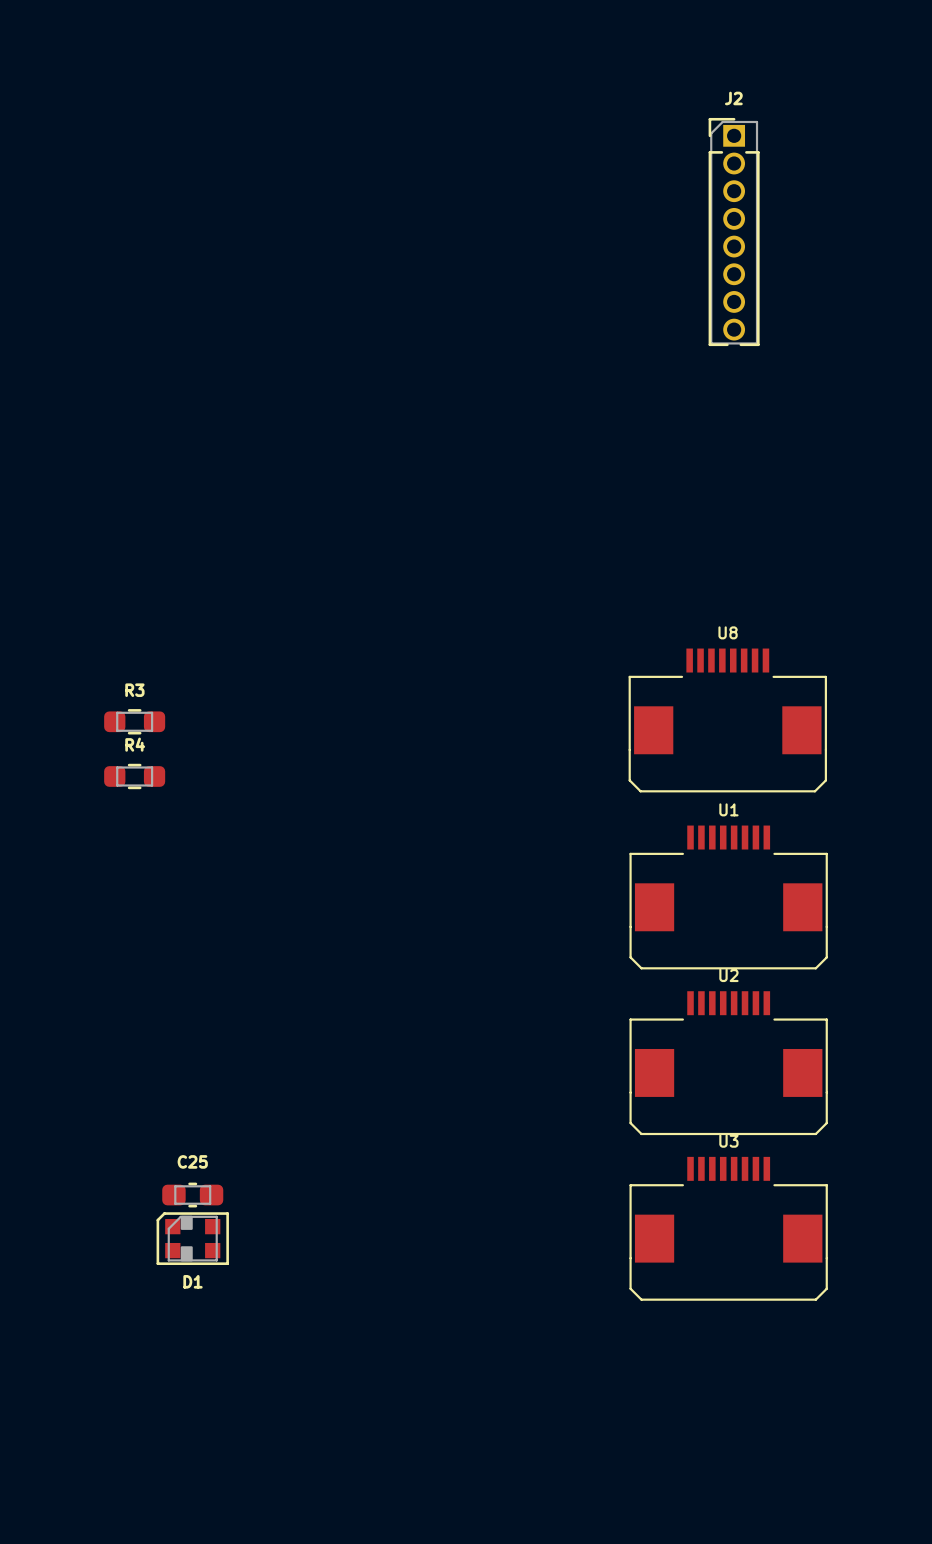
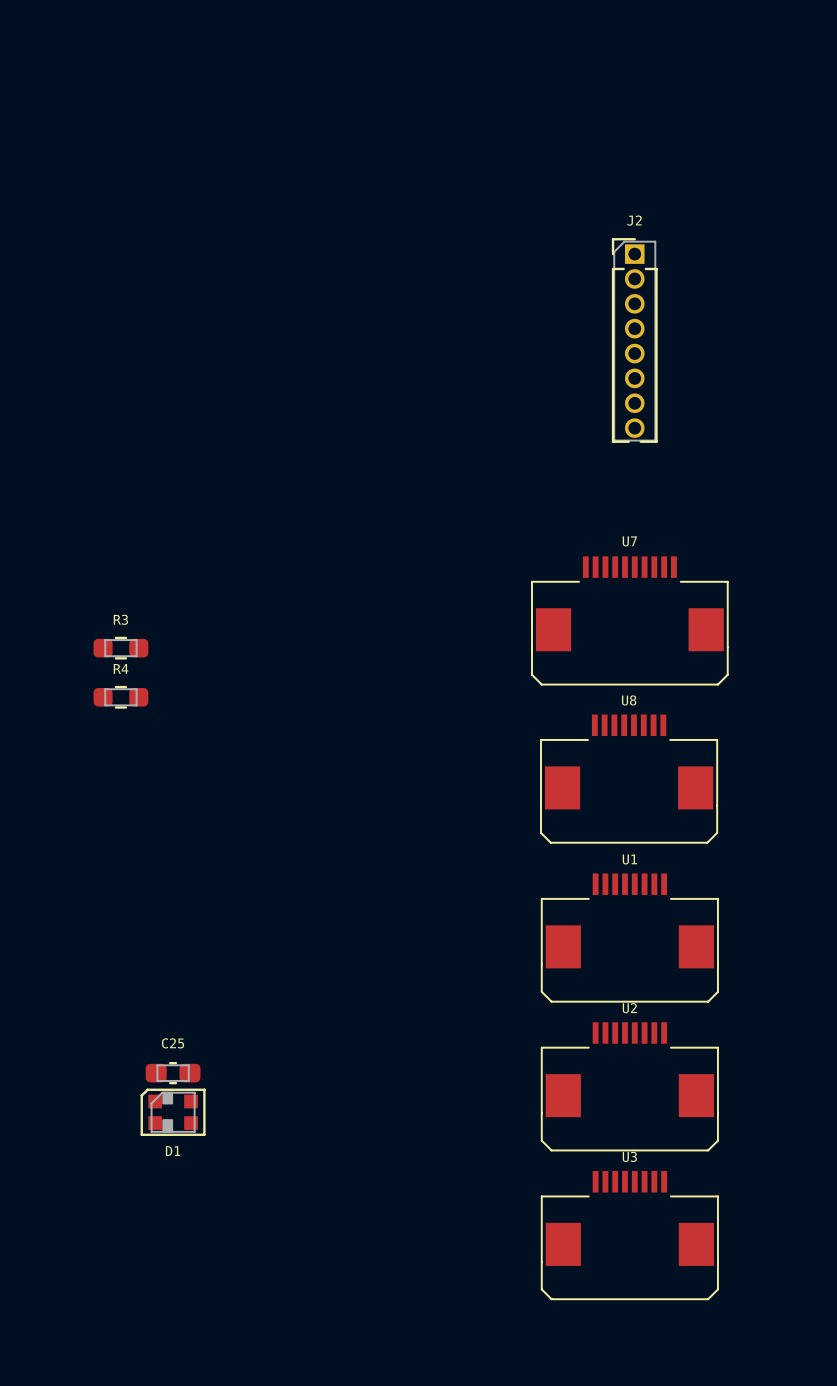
J2 position: (734, 232) -> (634, 340)
U7: none -> (629, 620)
U8 position: (727, 720) -> (629, 779)
U1 position: (728, 897) -> (629, 938)
U2 position: (728, 1063) -> (629, 1086)
U3 position: (728, 1228) -> (629, 1235)

